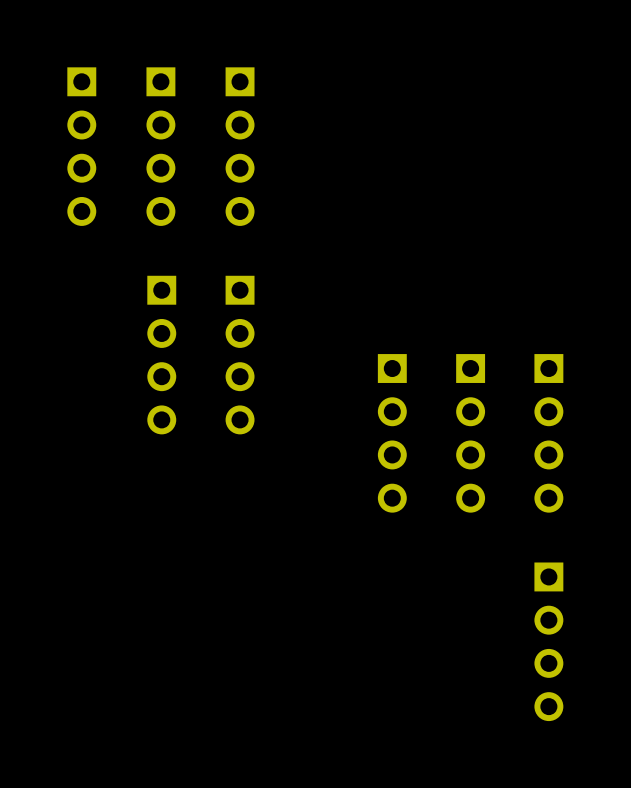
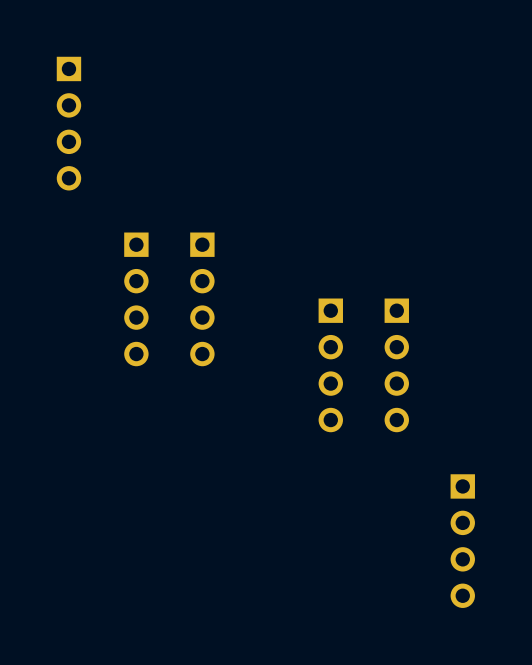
part: (160, 146) -> none
part: (240, 146) -> none
part: (548, 433) -> none

